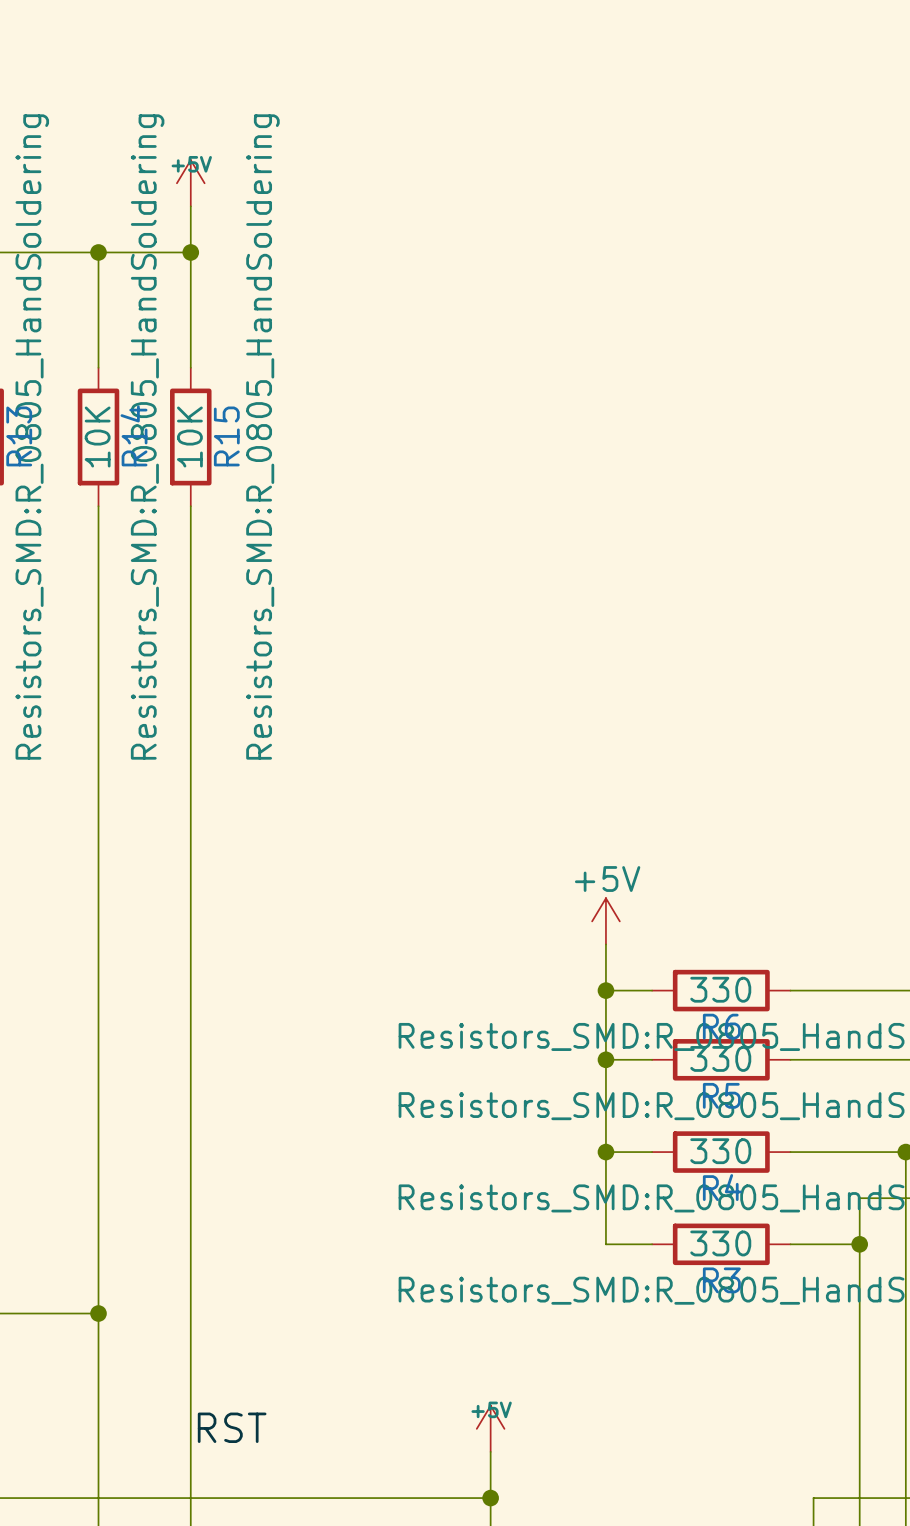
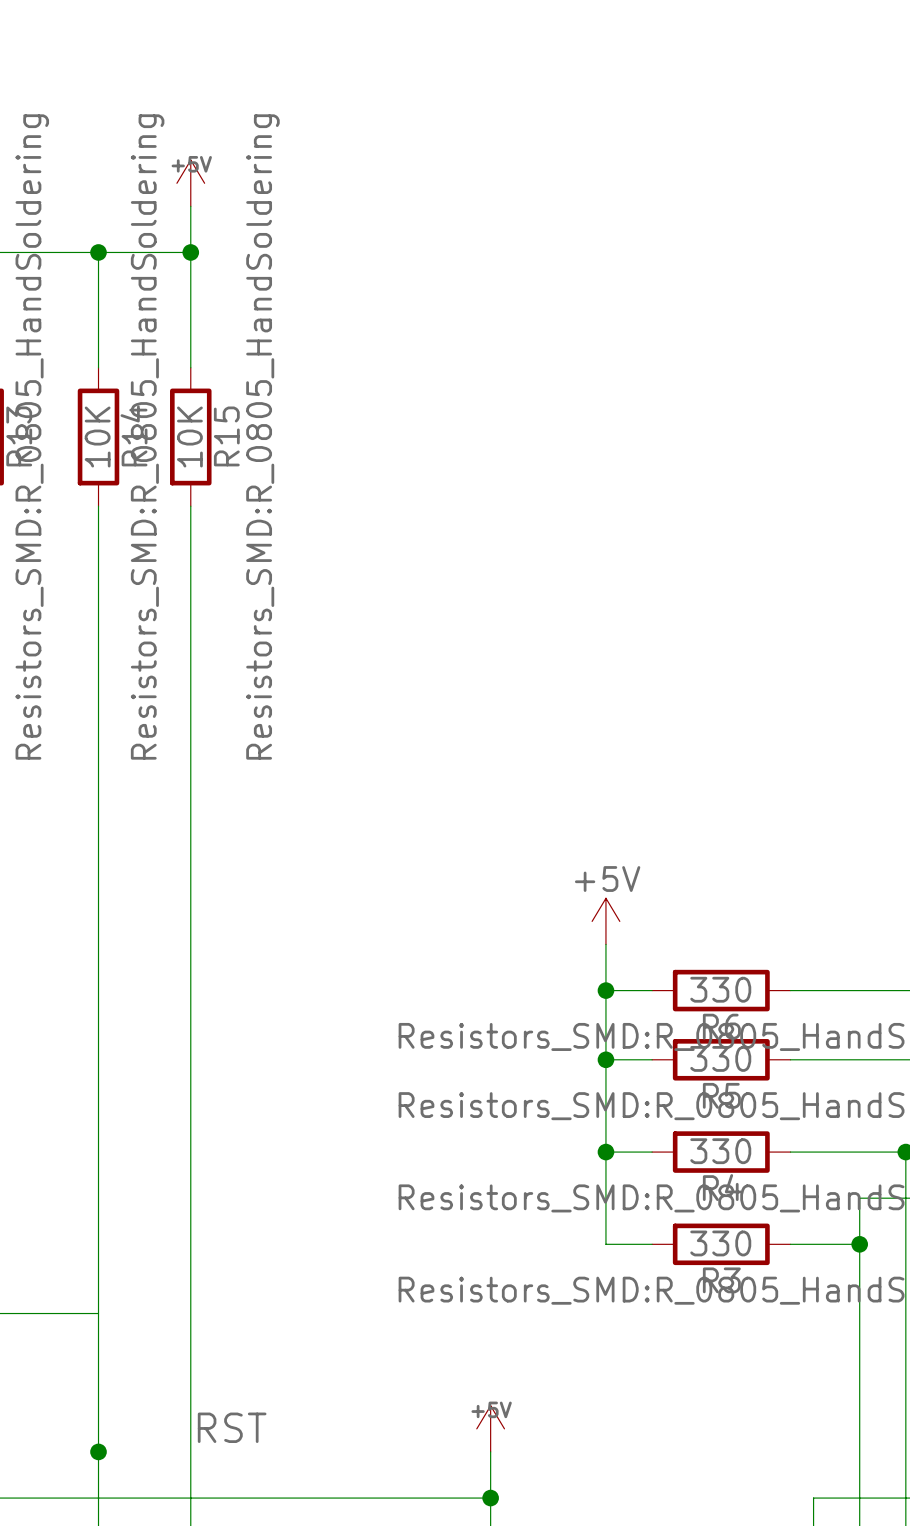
junction: (98, 1313) -> none
junction: none -> (98, 1451)

